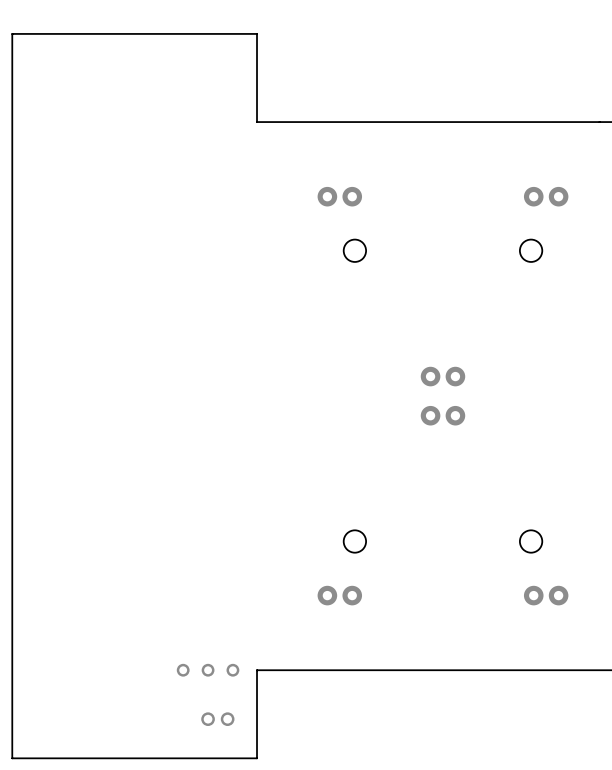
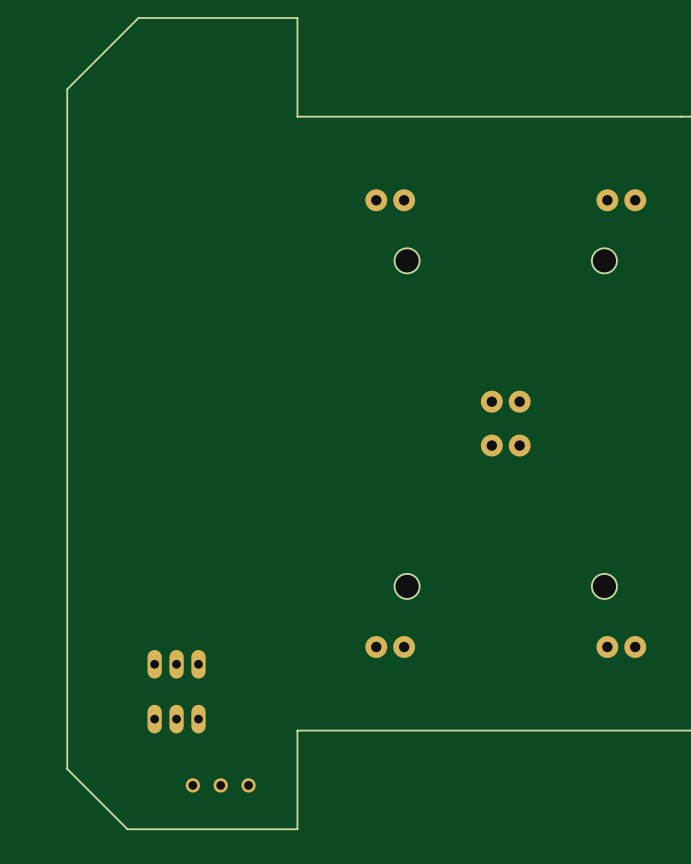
board edge: (115, 33) (12, 33) (12, 758) (105, 758) -> (138, 17) (67, 89) (67, 768) (127, 829)
part: none -> (176, 664)
part: none -> (176, 719)
part position: (208, 670) -> (220, 785)
part: (217, 719) -> none

